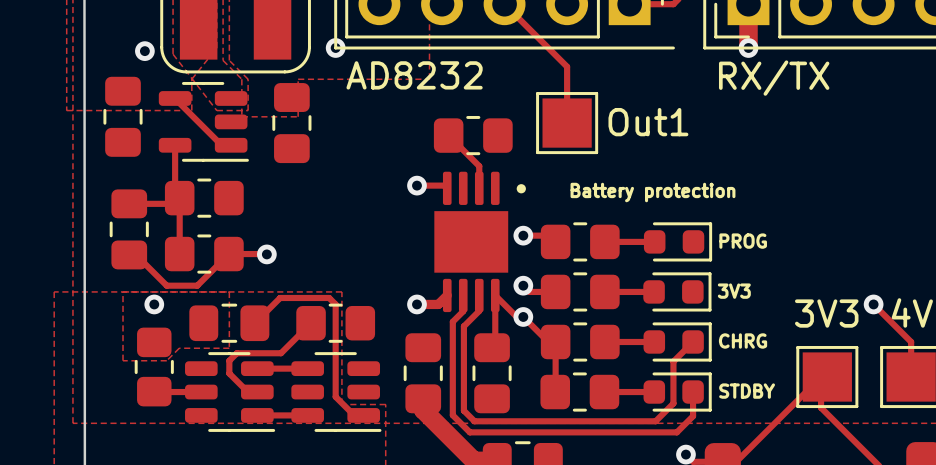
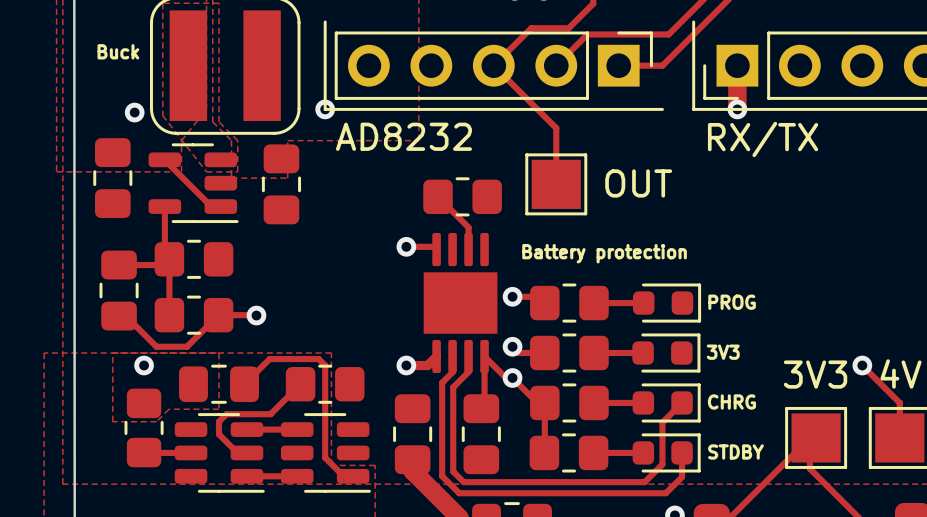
Out1 name: Out1 (648, 122) -> OUT (638, 183)
part footprint: [434, 171, 526, 313] -> [423, 232, 498, 374]
text position: Battery protection (652, 192) -> Battery protection (604, 253)

